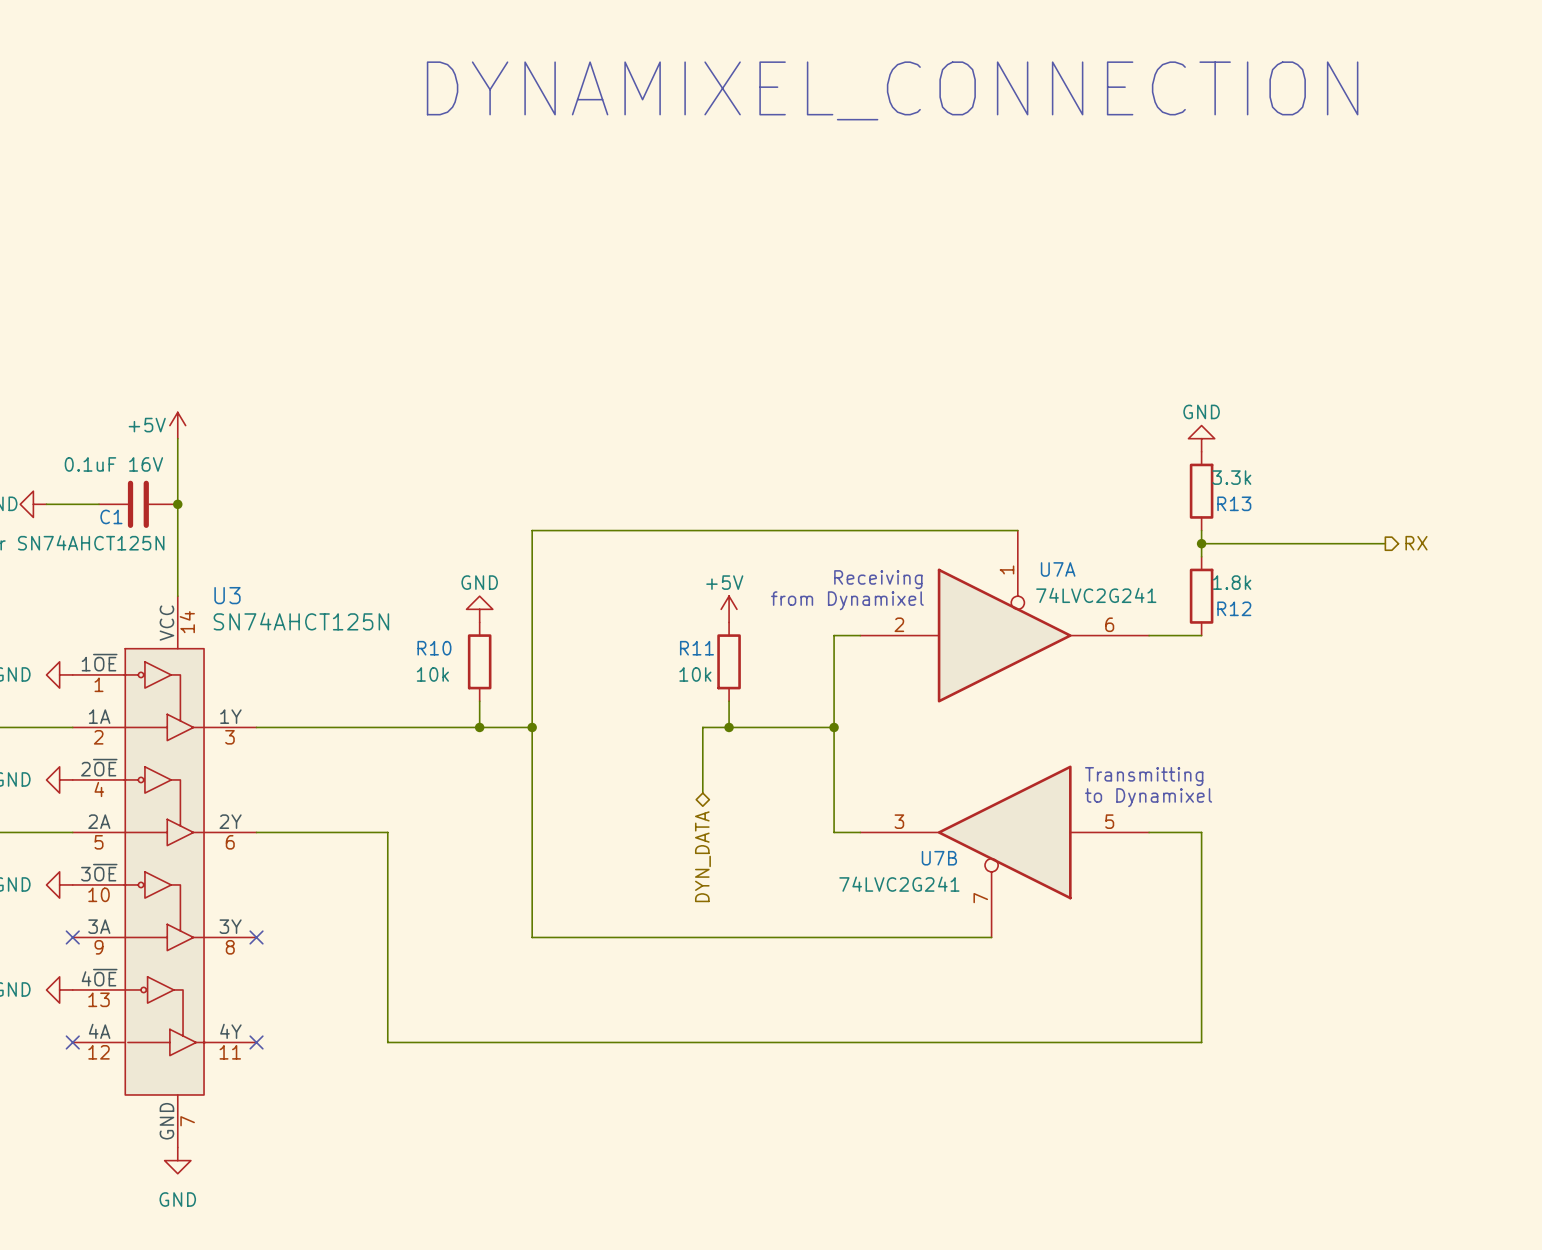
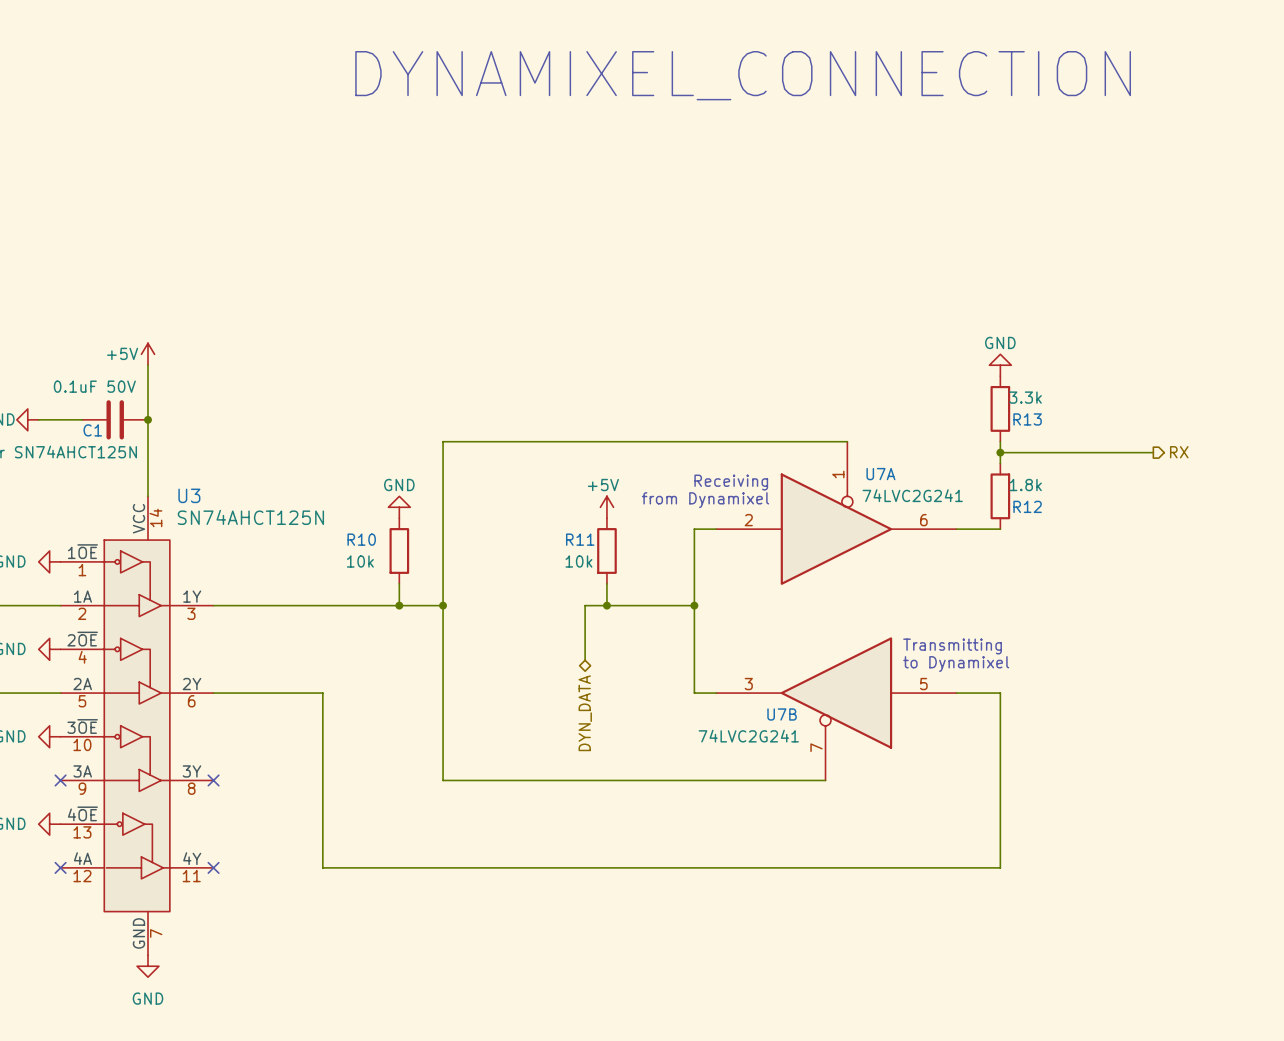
C1 value: 0.1uF 16V (113, 464) -> 0.1uF 50V (94, 386)

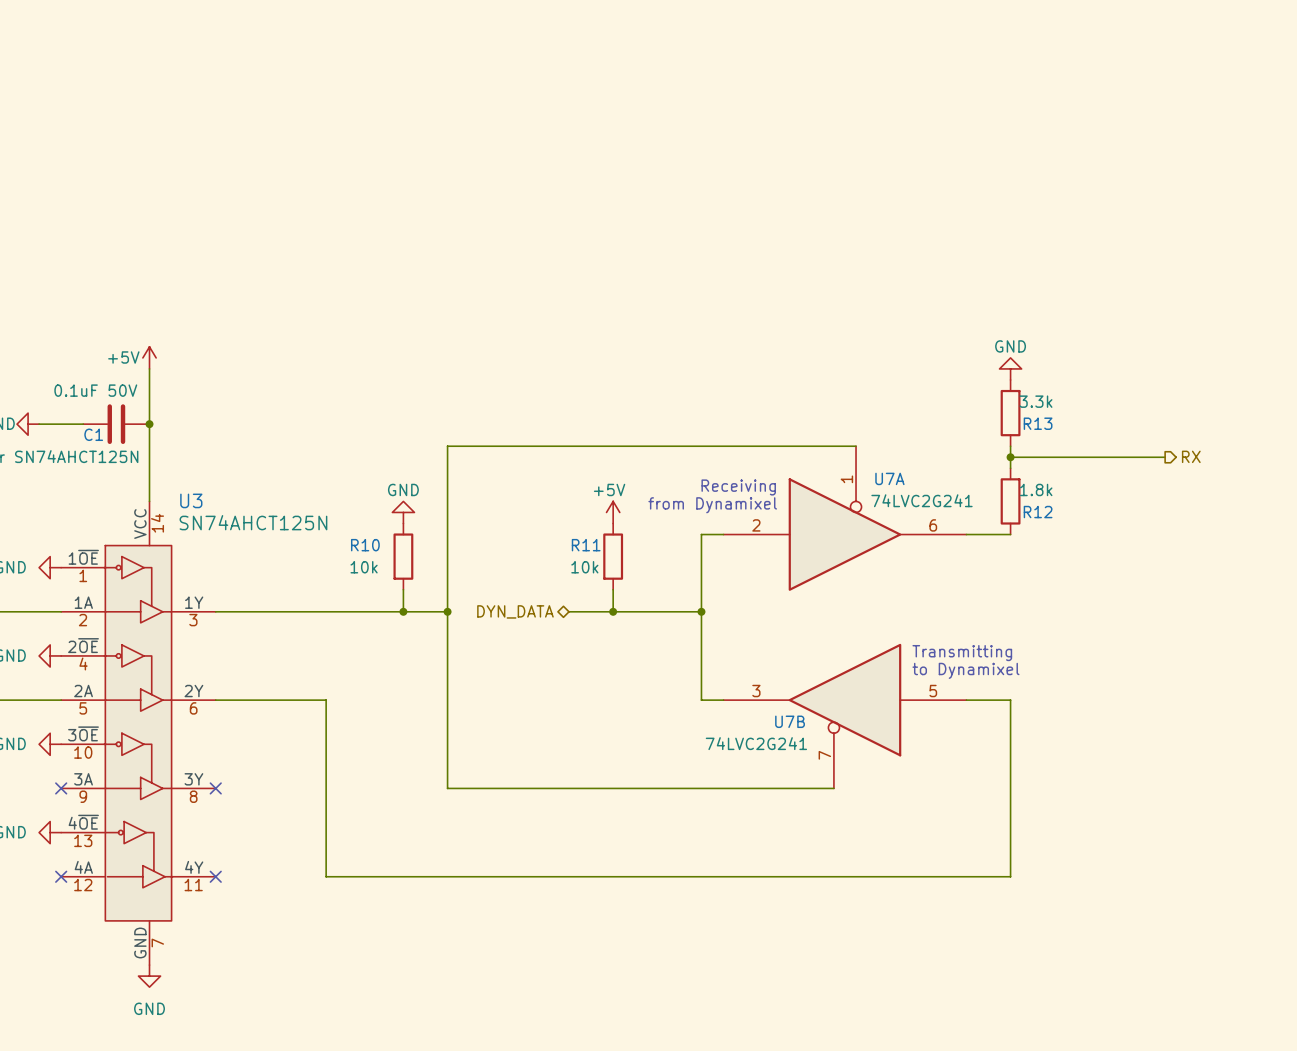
text: DYNAMIXEL_CONNECTION (743, 75) -> none
wire: (585, 605) (585, 660) -> (591, 611) (569, 611)
hierarchical label rotation: 0° (585, 713) -> 90° clockwise (515, 611)
hierarchical label position: DYN_DATA (585, 713) -> DYN_DATA (515, 611)

